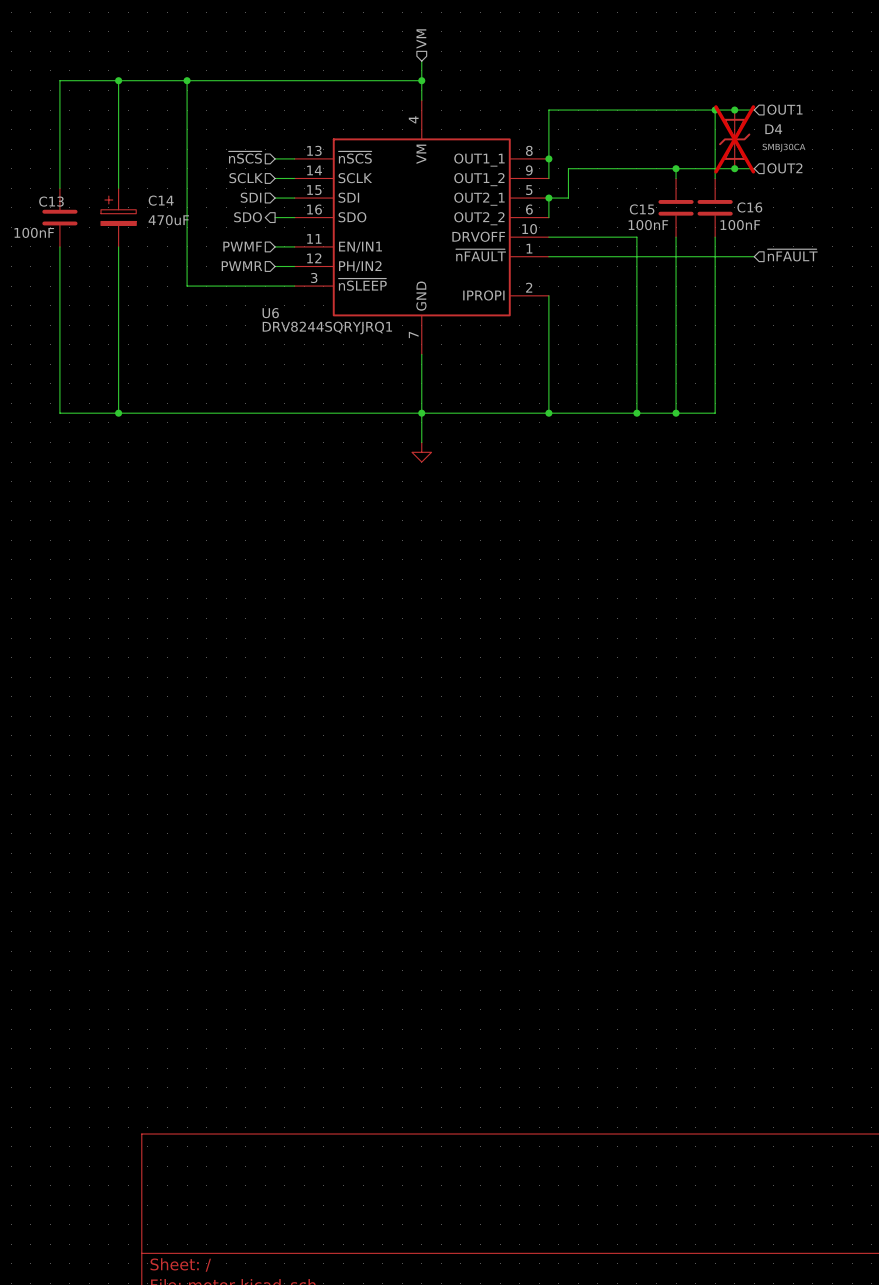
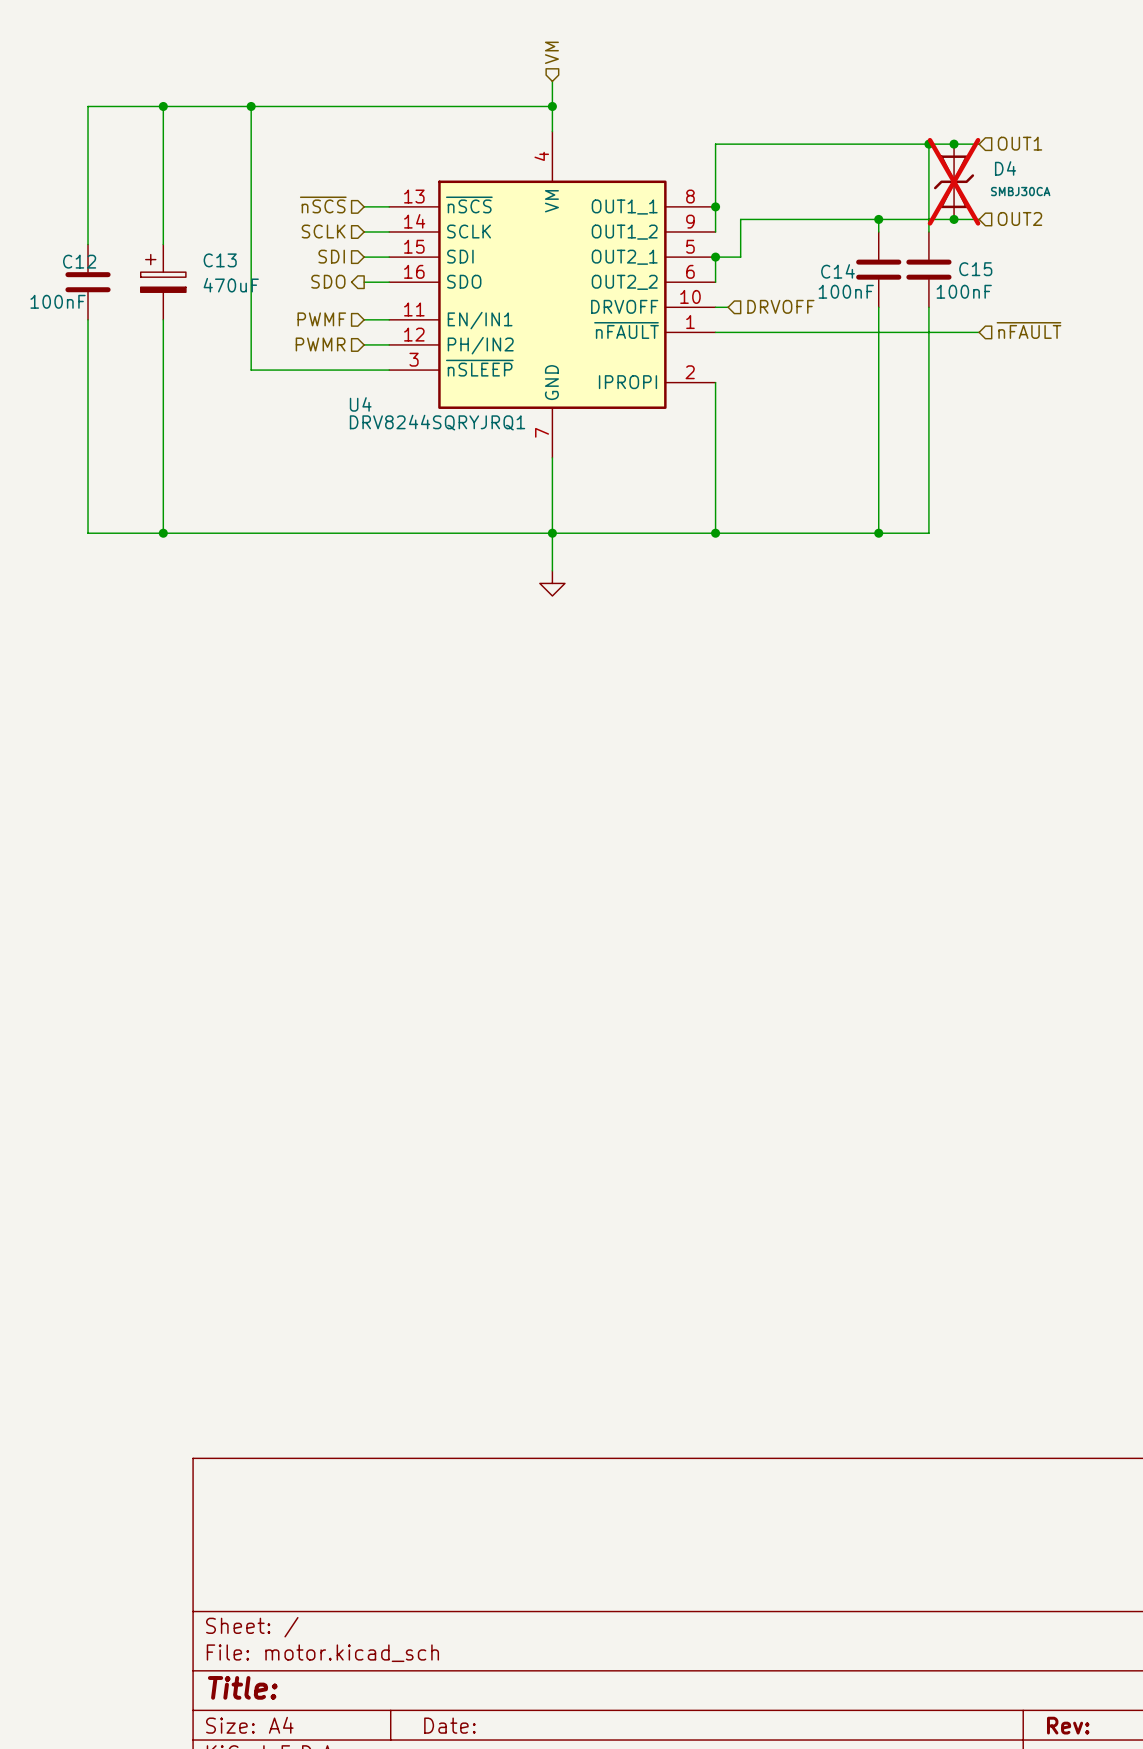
C14 name: C14 (161, 200) -> C13 (220, 260)
C13 name: C13 (51, 201) -> C12 (79, 261)
C16 name: C16 (749, 207) -> C15 (975, 269)
C15 name: C15 (642, 209) -> C14 (838, 271)
hierarchical label: none -> DRVOFF (780, 306)
wire: (558, 237) (636, 237) (636, 413) -> none
U6 name: U6 (270, 313) -> U4 (360, 404)
junction: (636, 413) -> none

